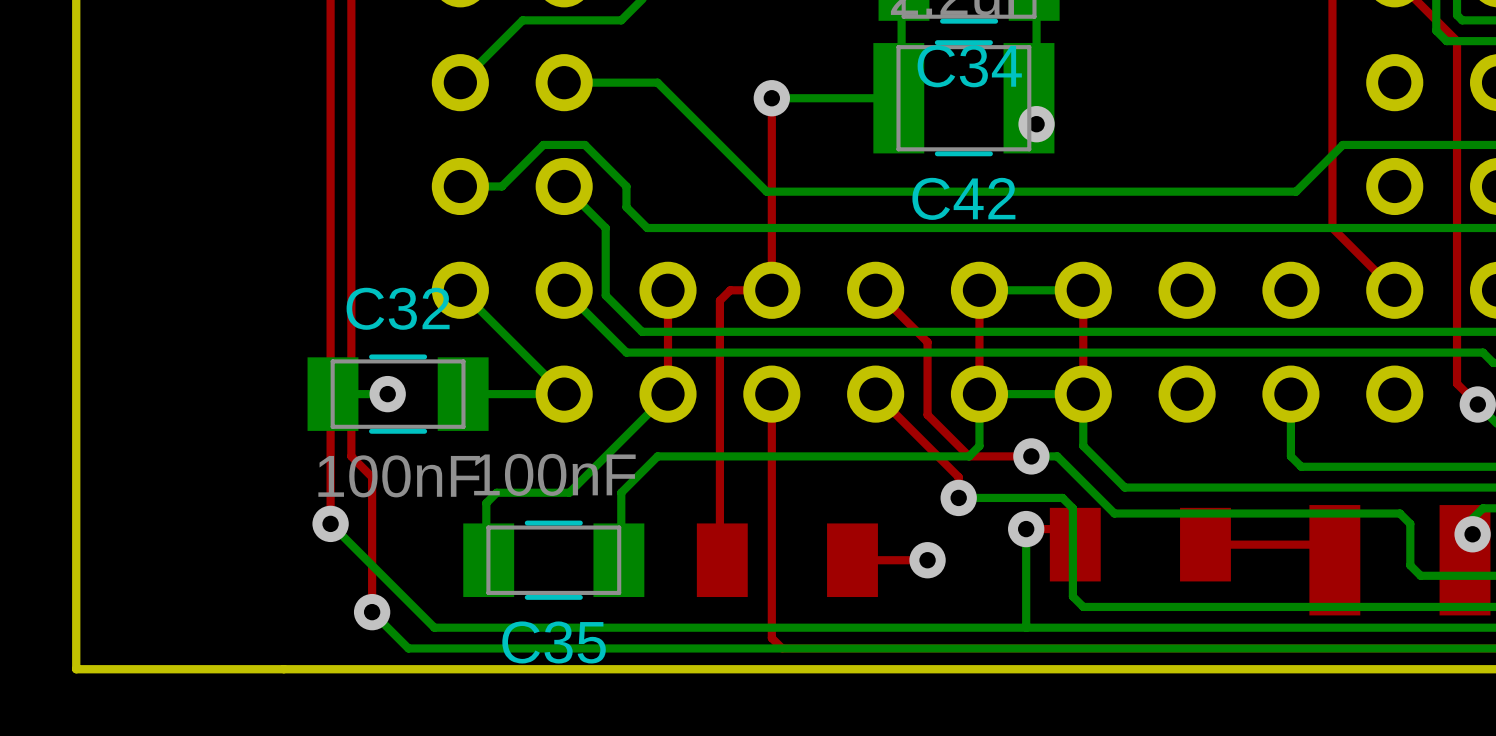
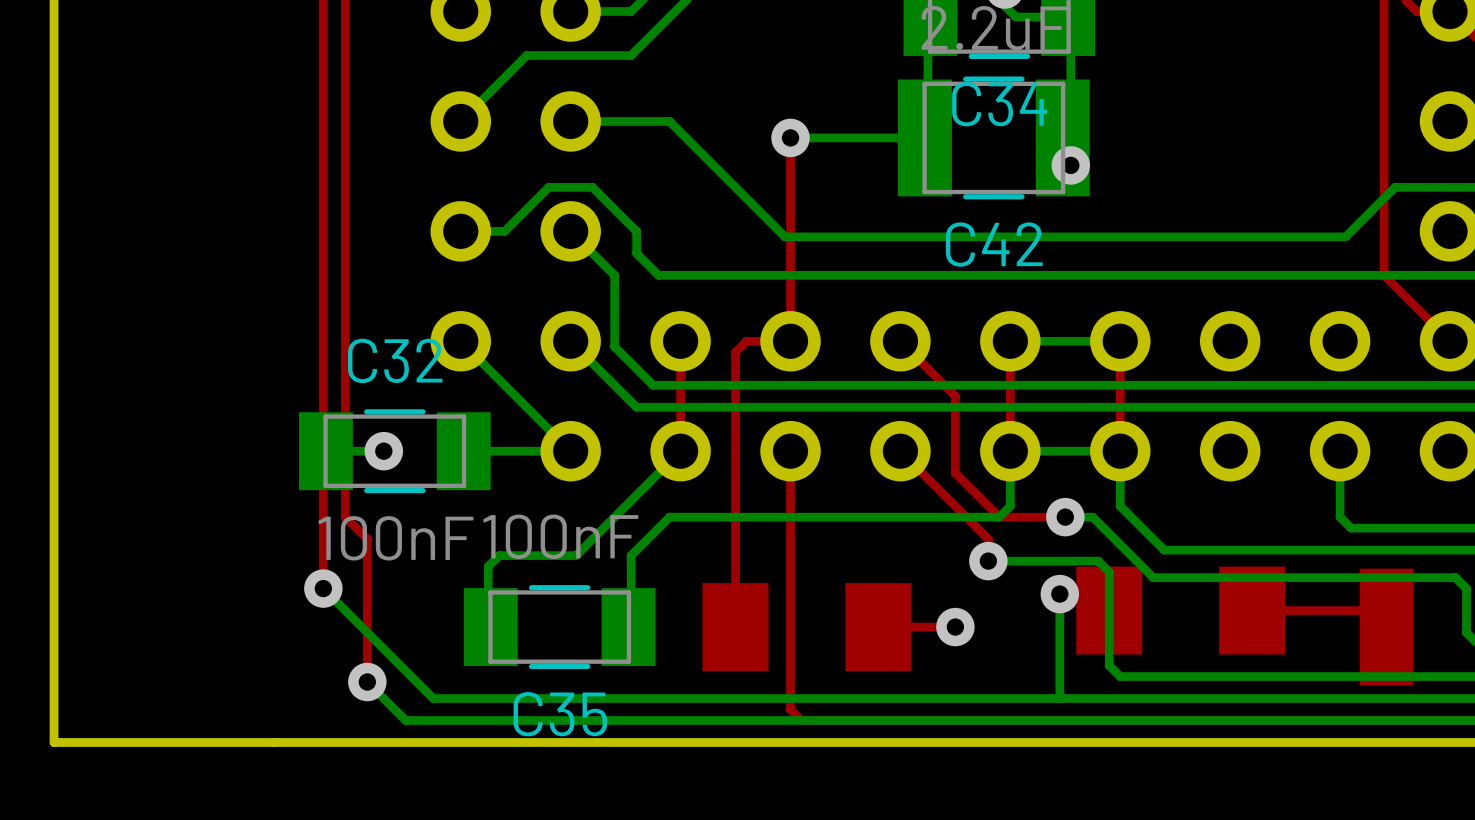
part footprint: [1049, 507, 1231, 582] -> [1076, 566, 1286, 655]
part footprint: [696, 523, 878, 598] -> [702, 583, 912, 672]

